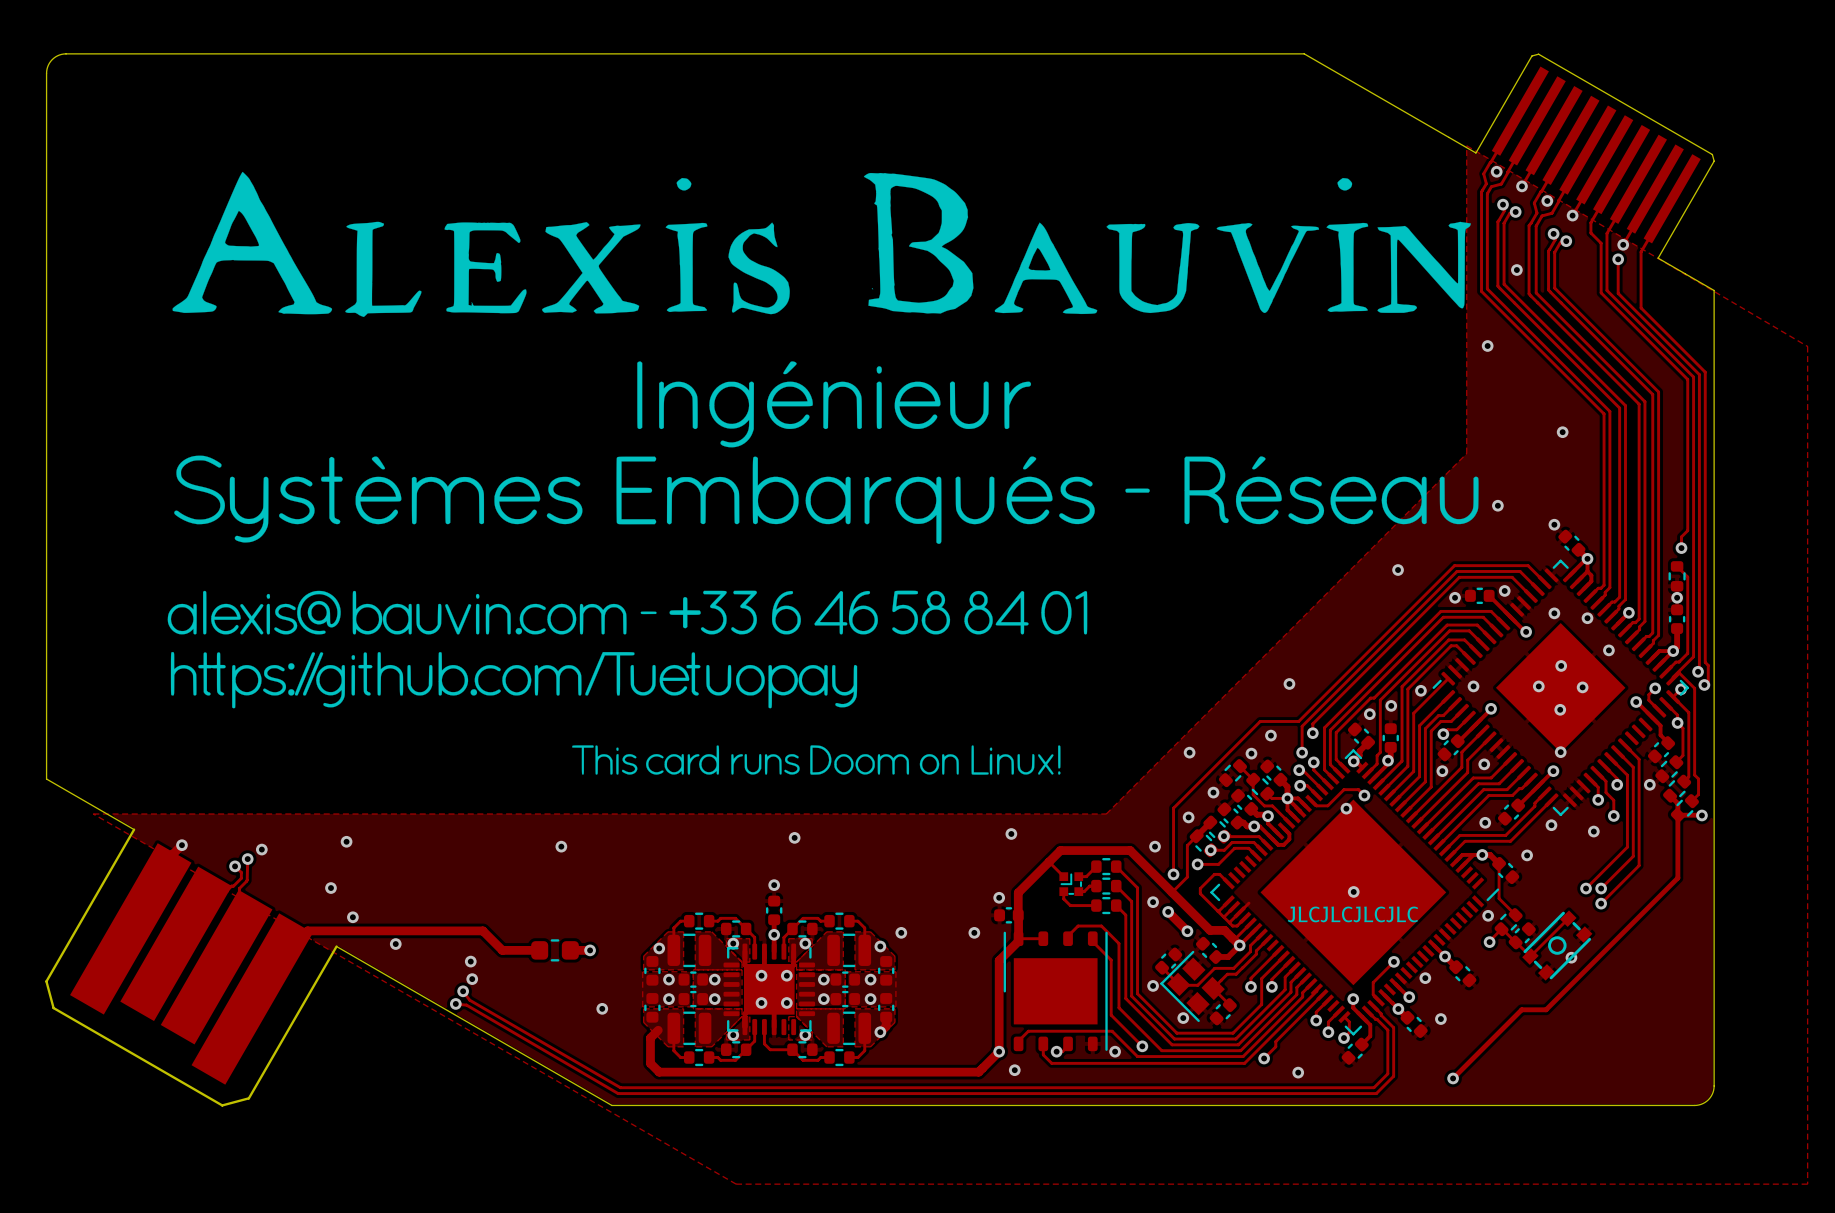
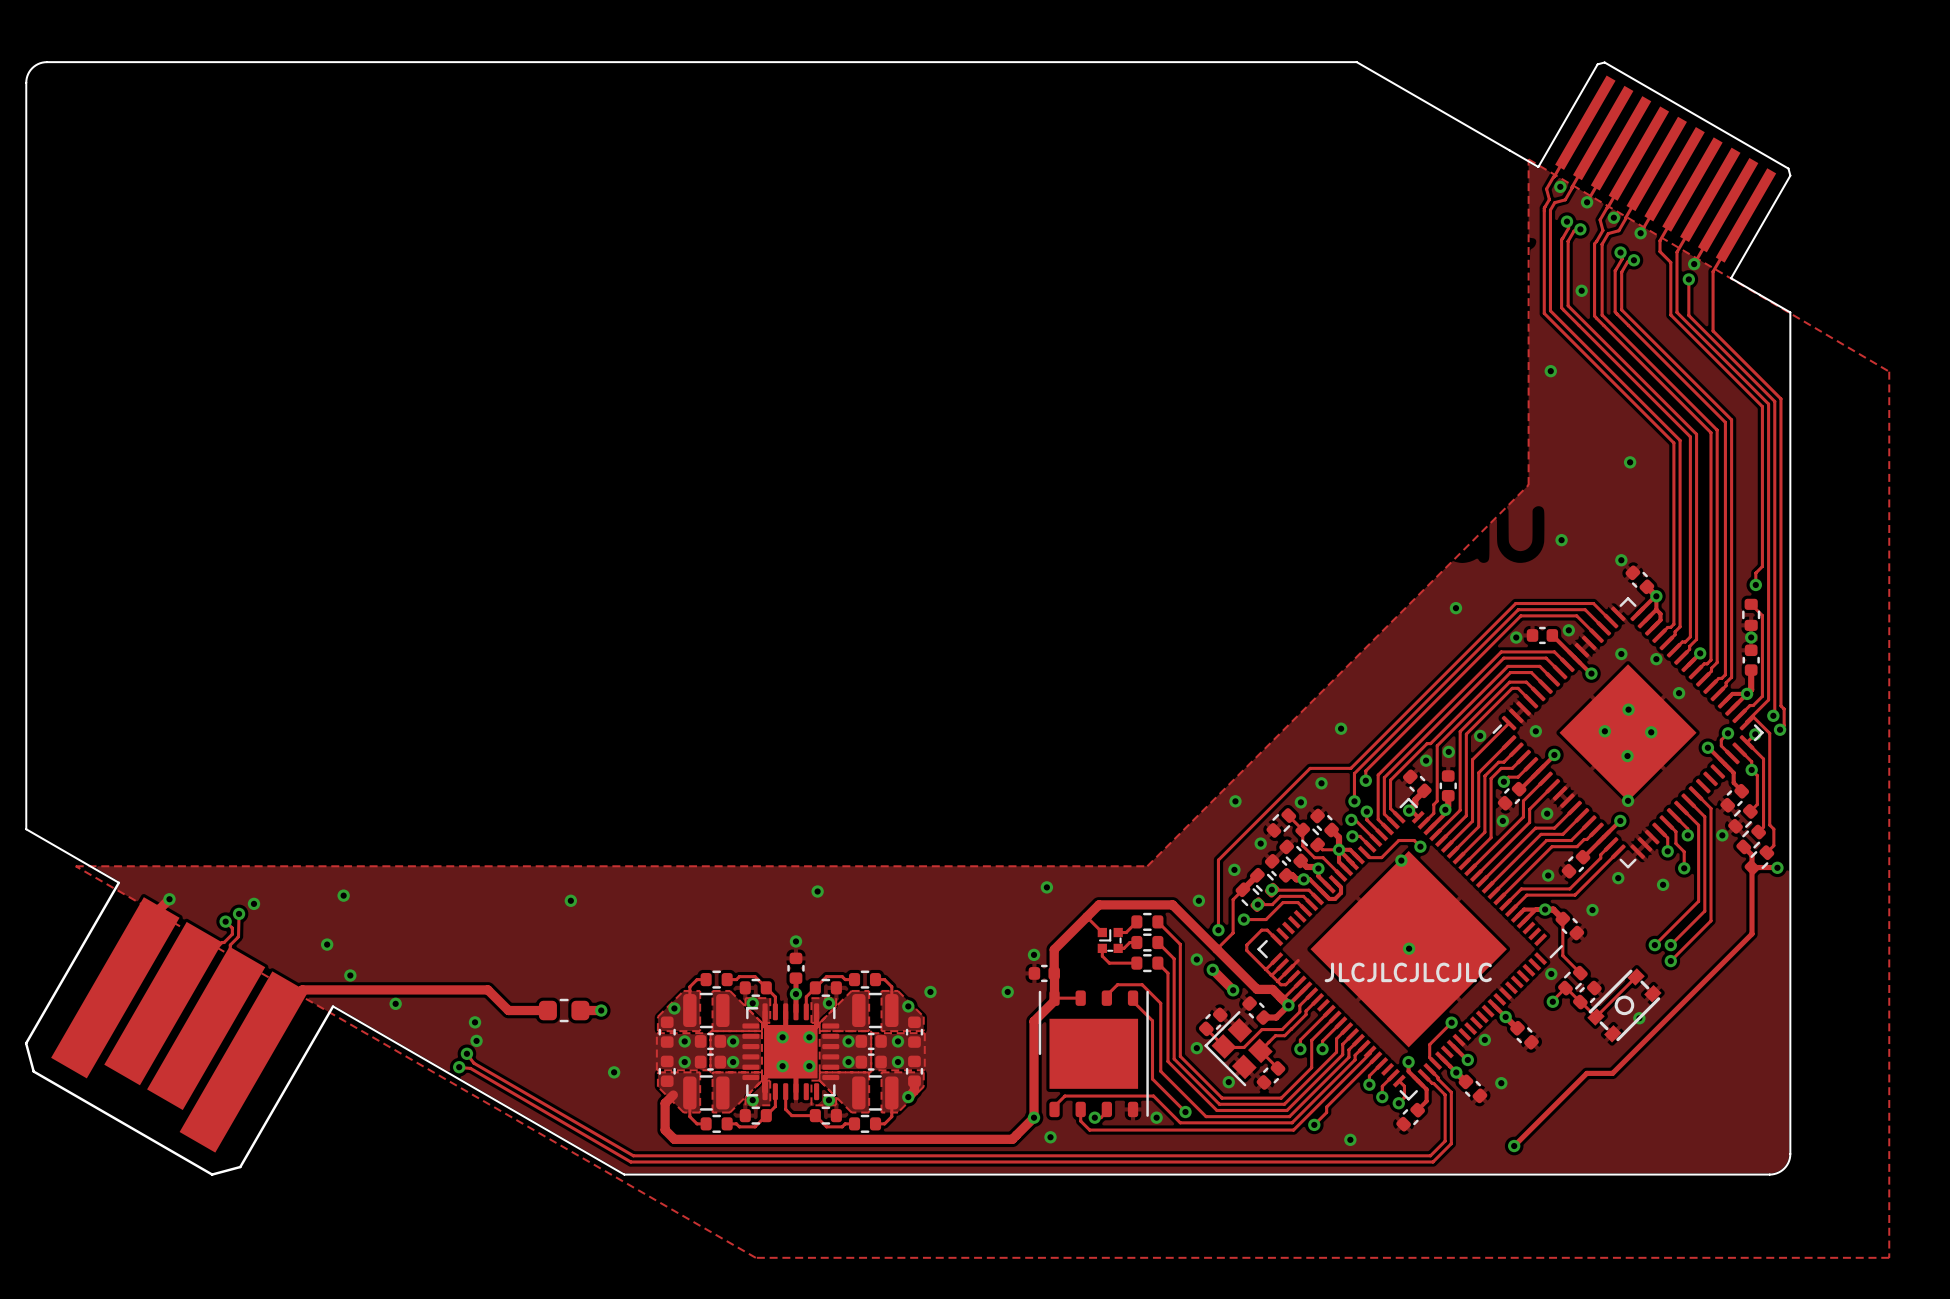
drawing: [167, 171, 1479, 775] -> none

